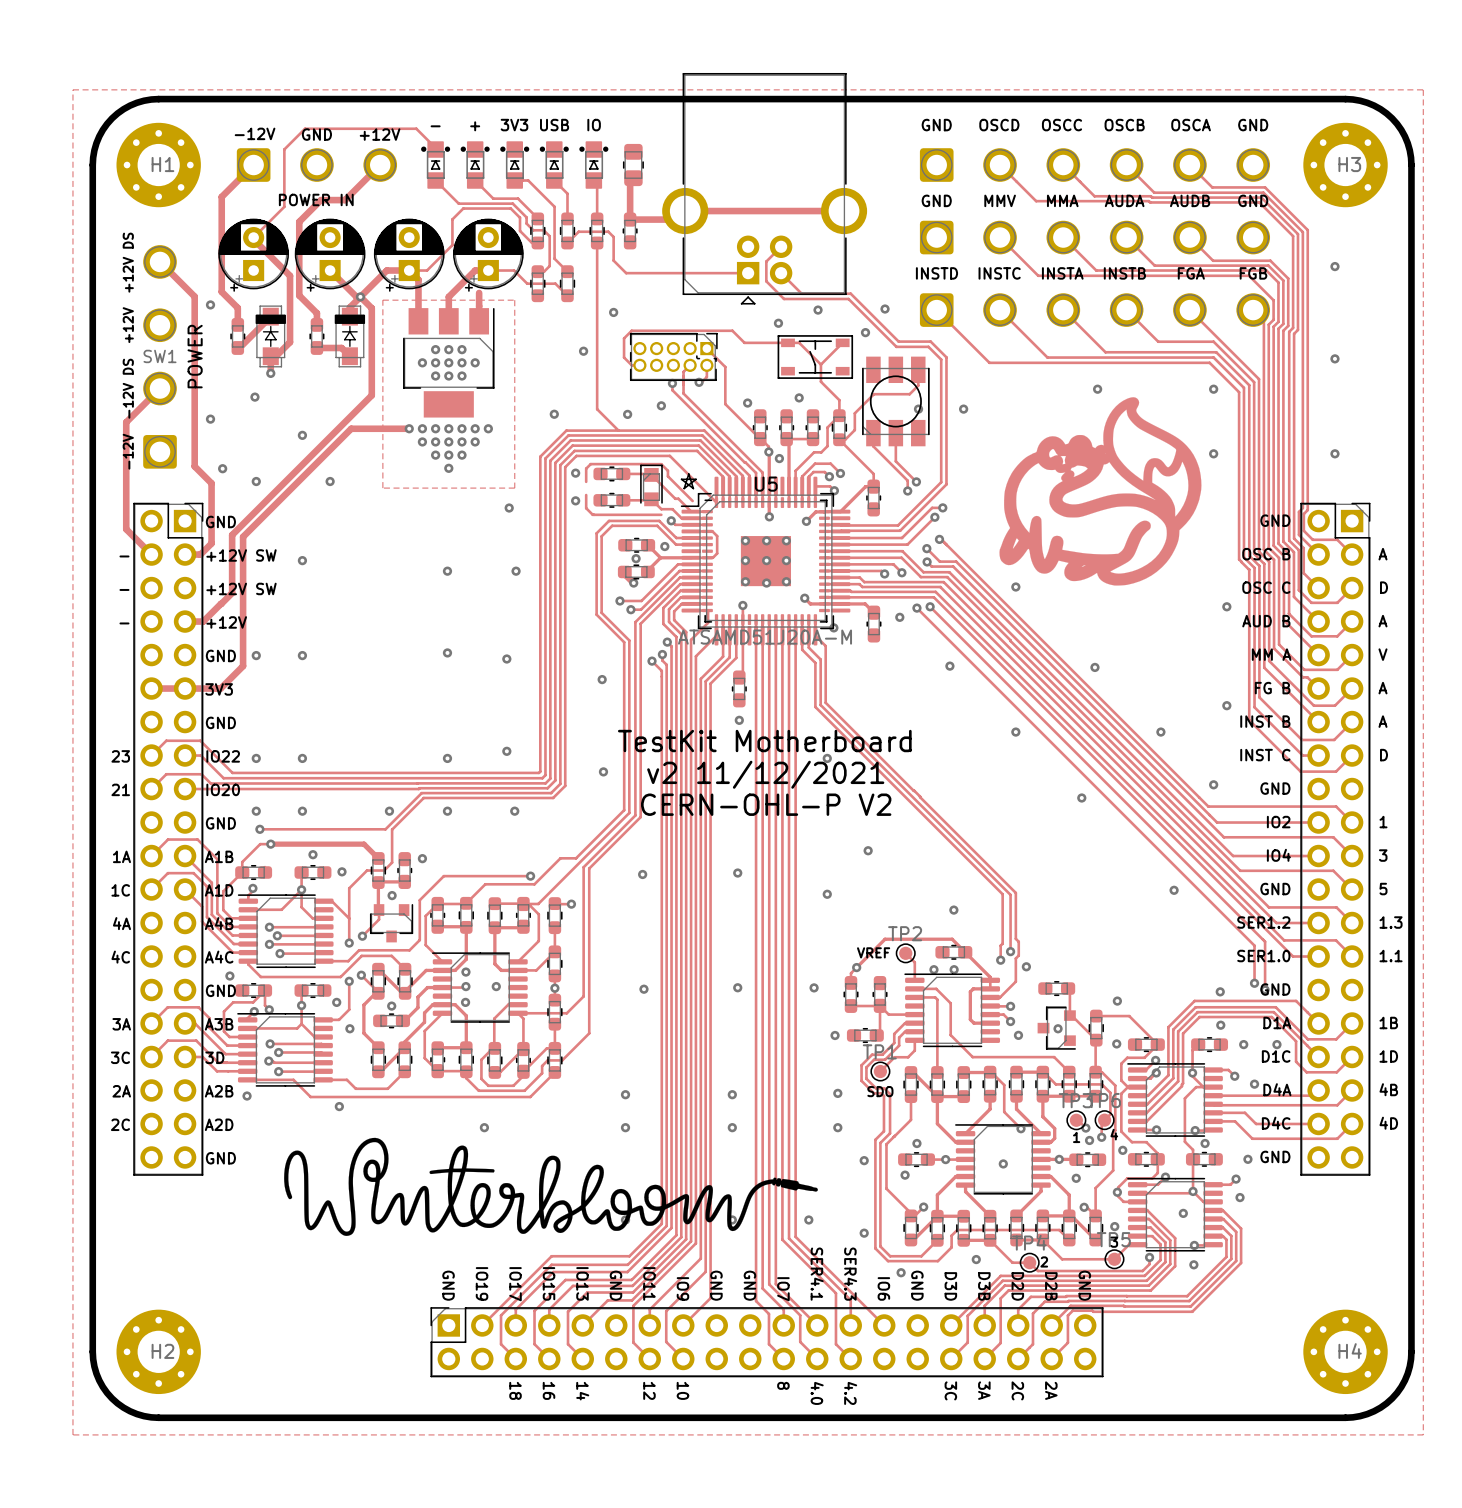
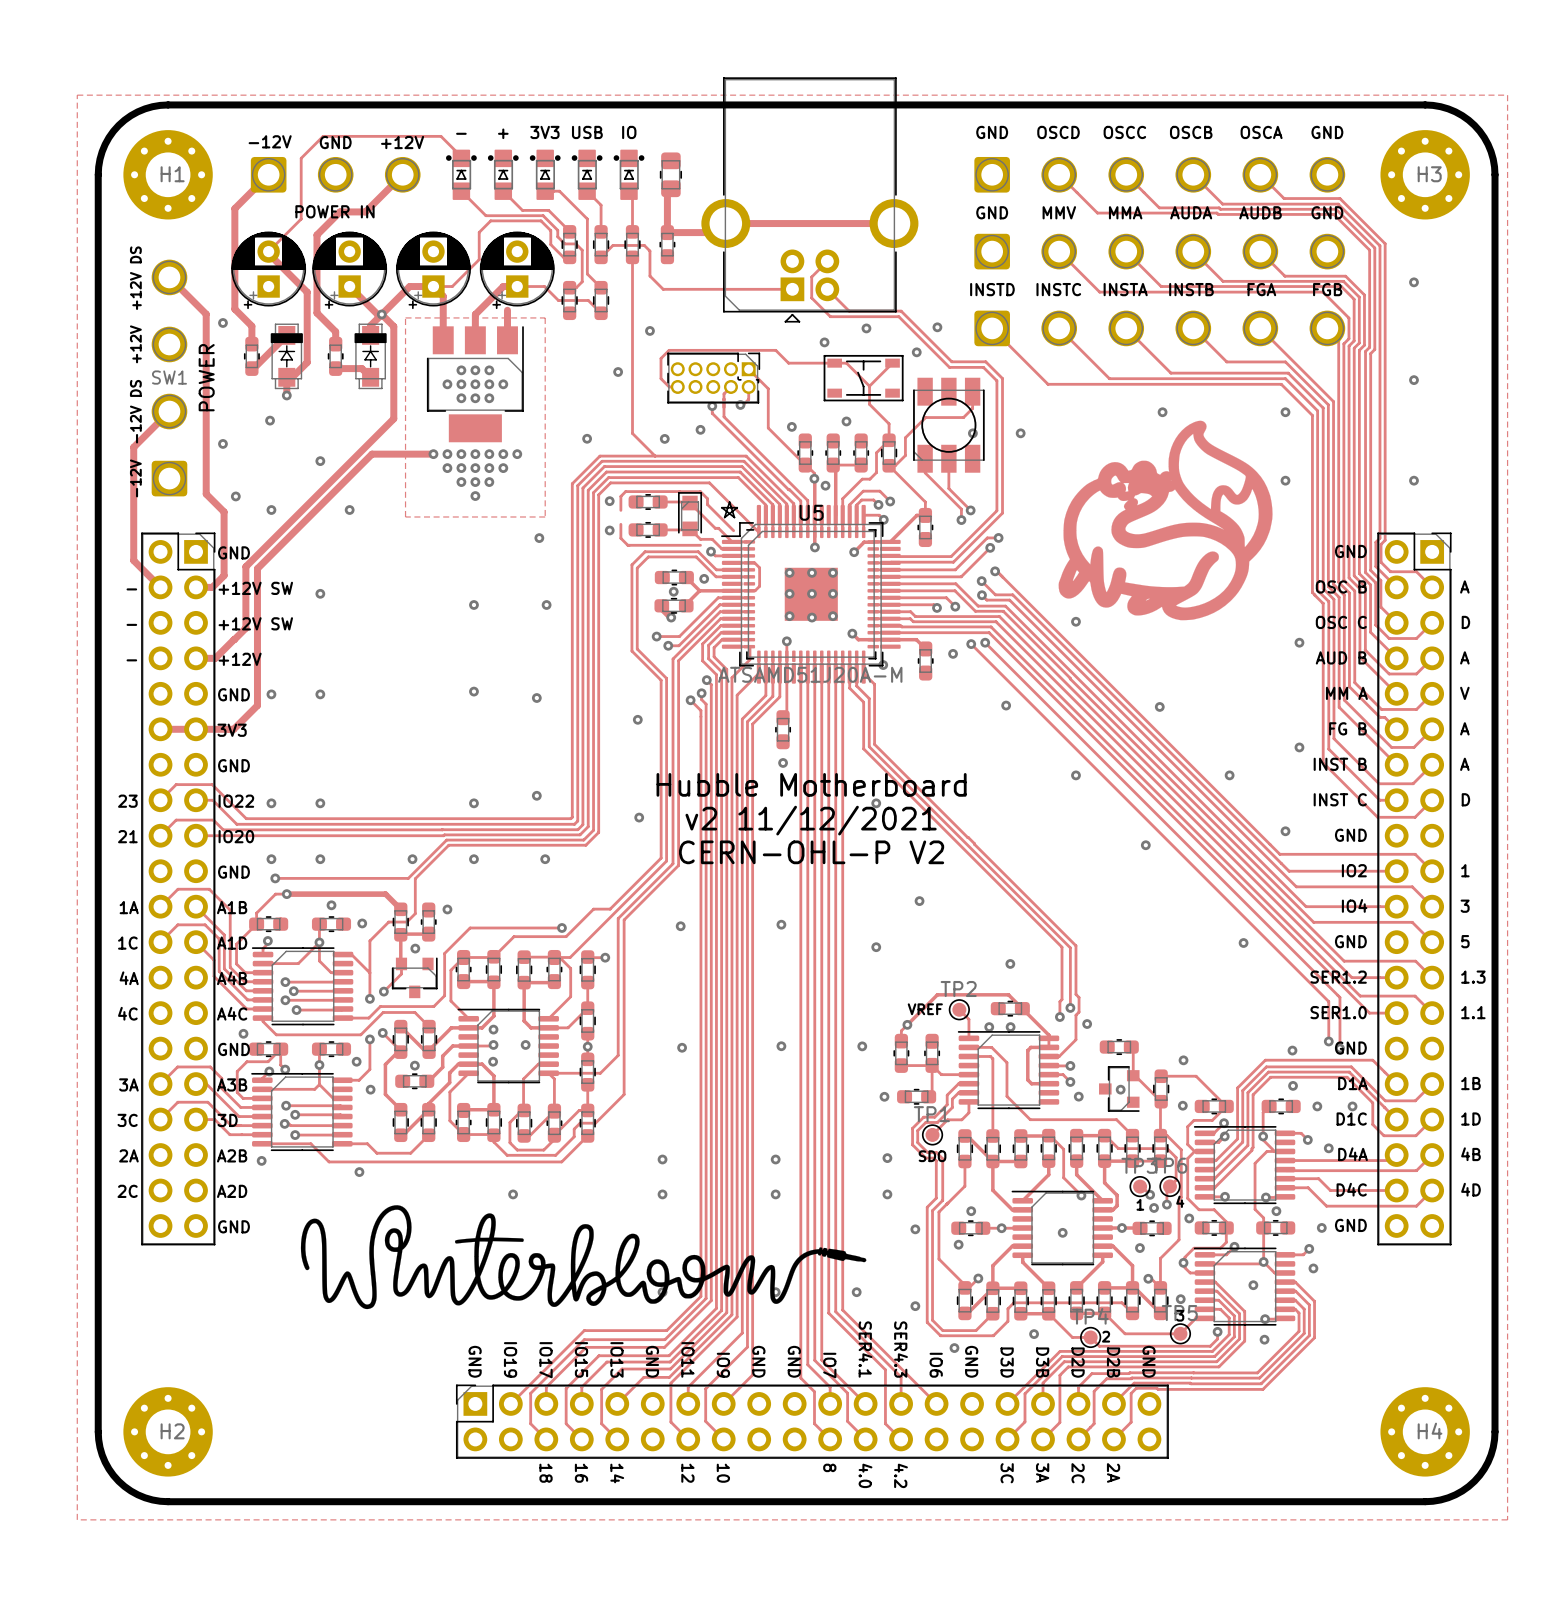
text: TestKit Motherboard (764, 741) -> Hubble Motherboard (811, 784)

